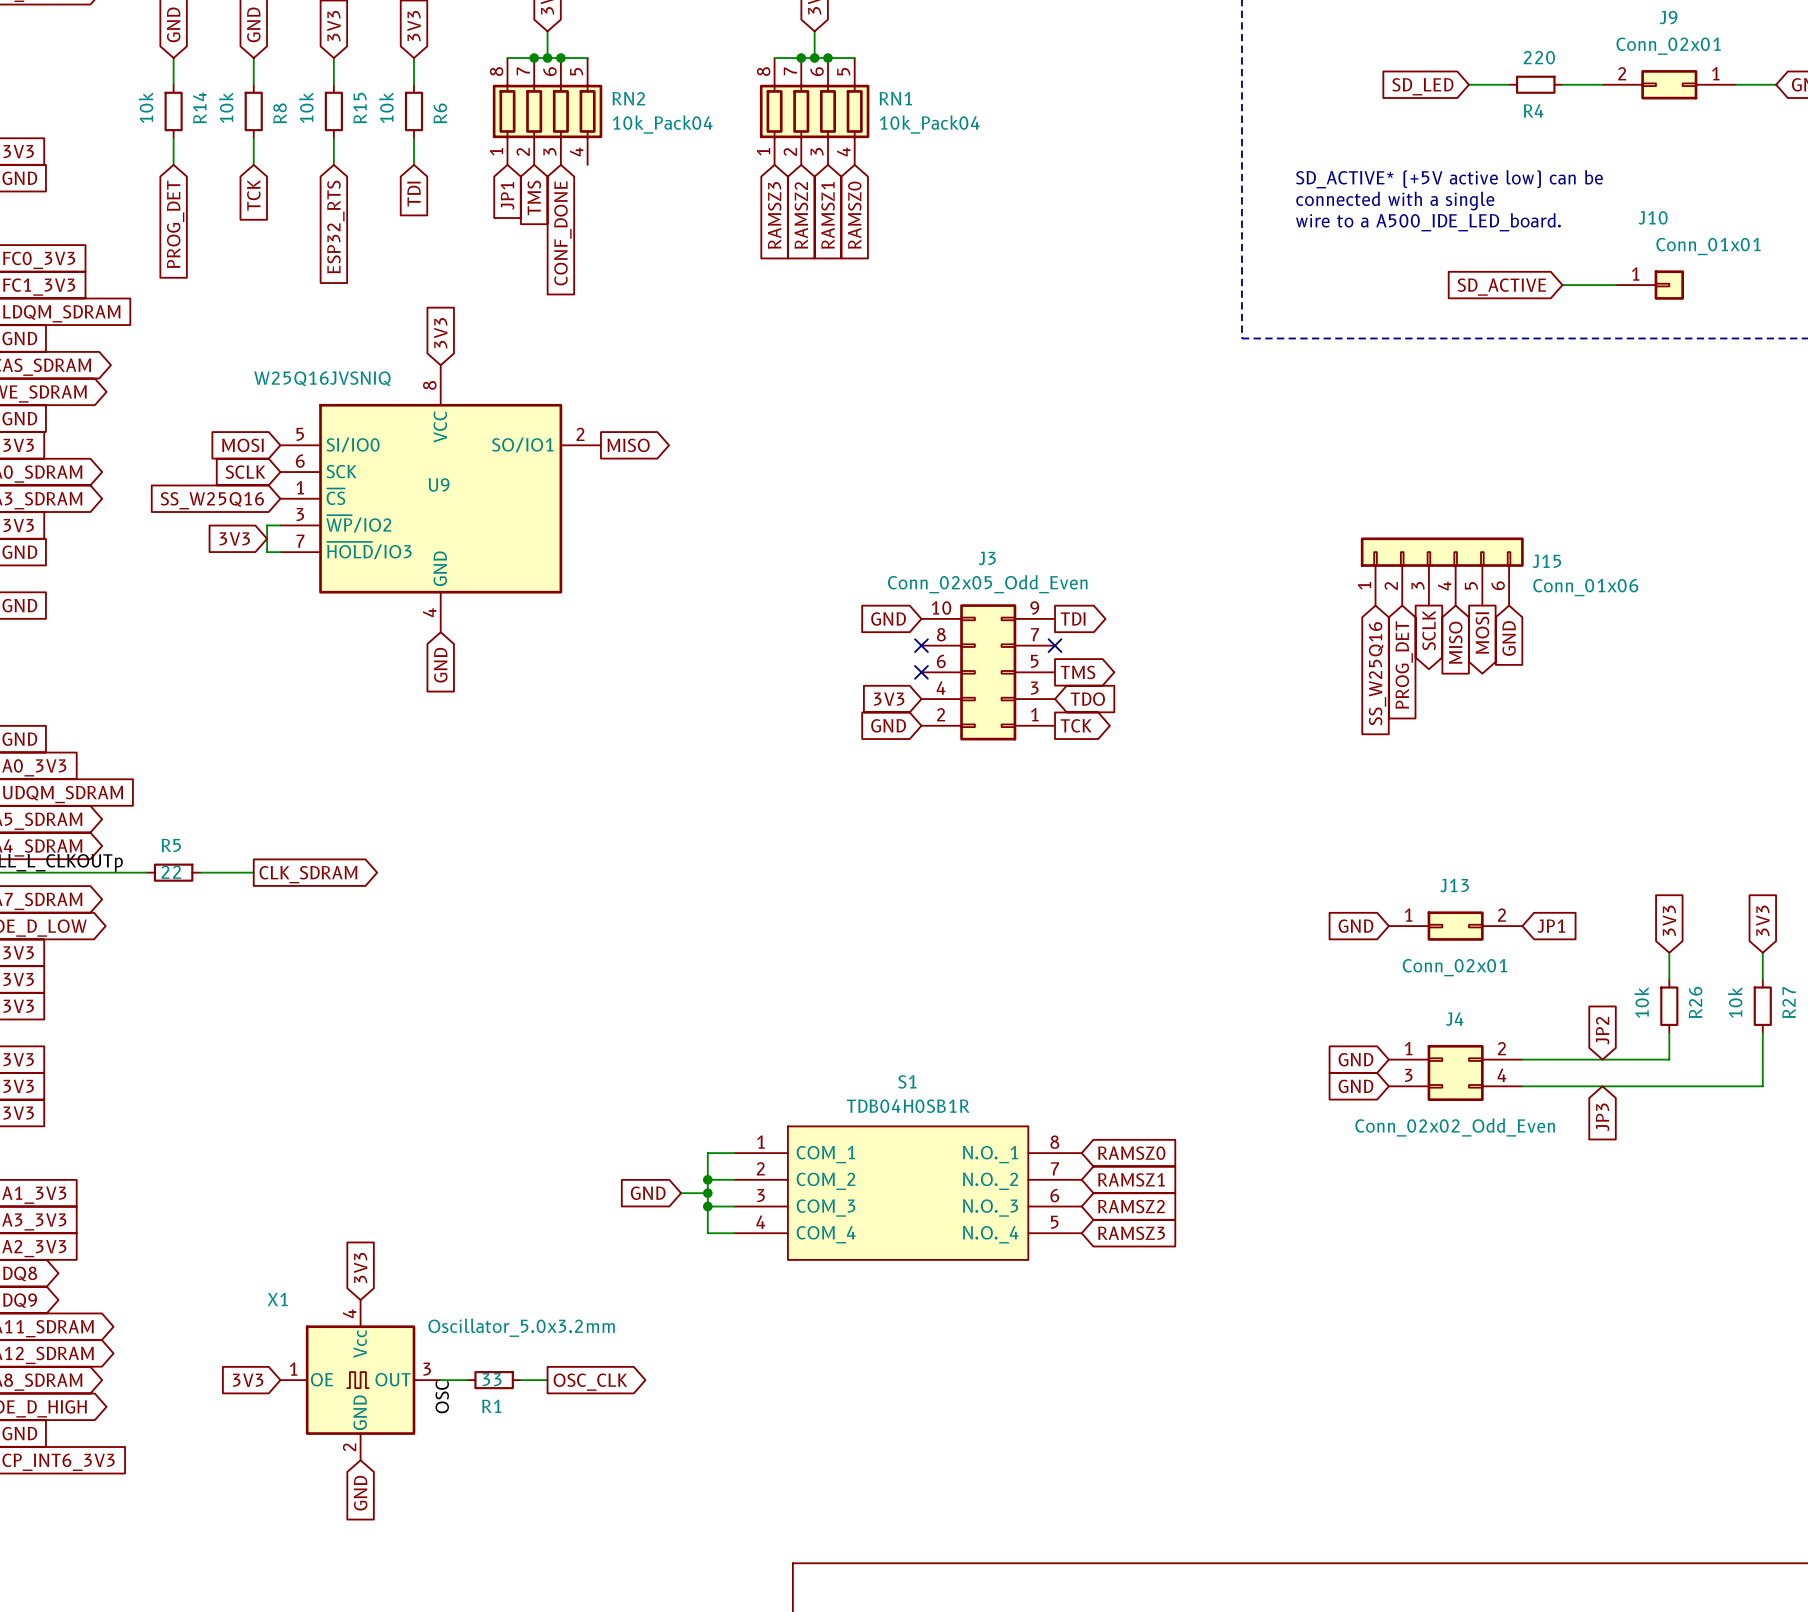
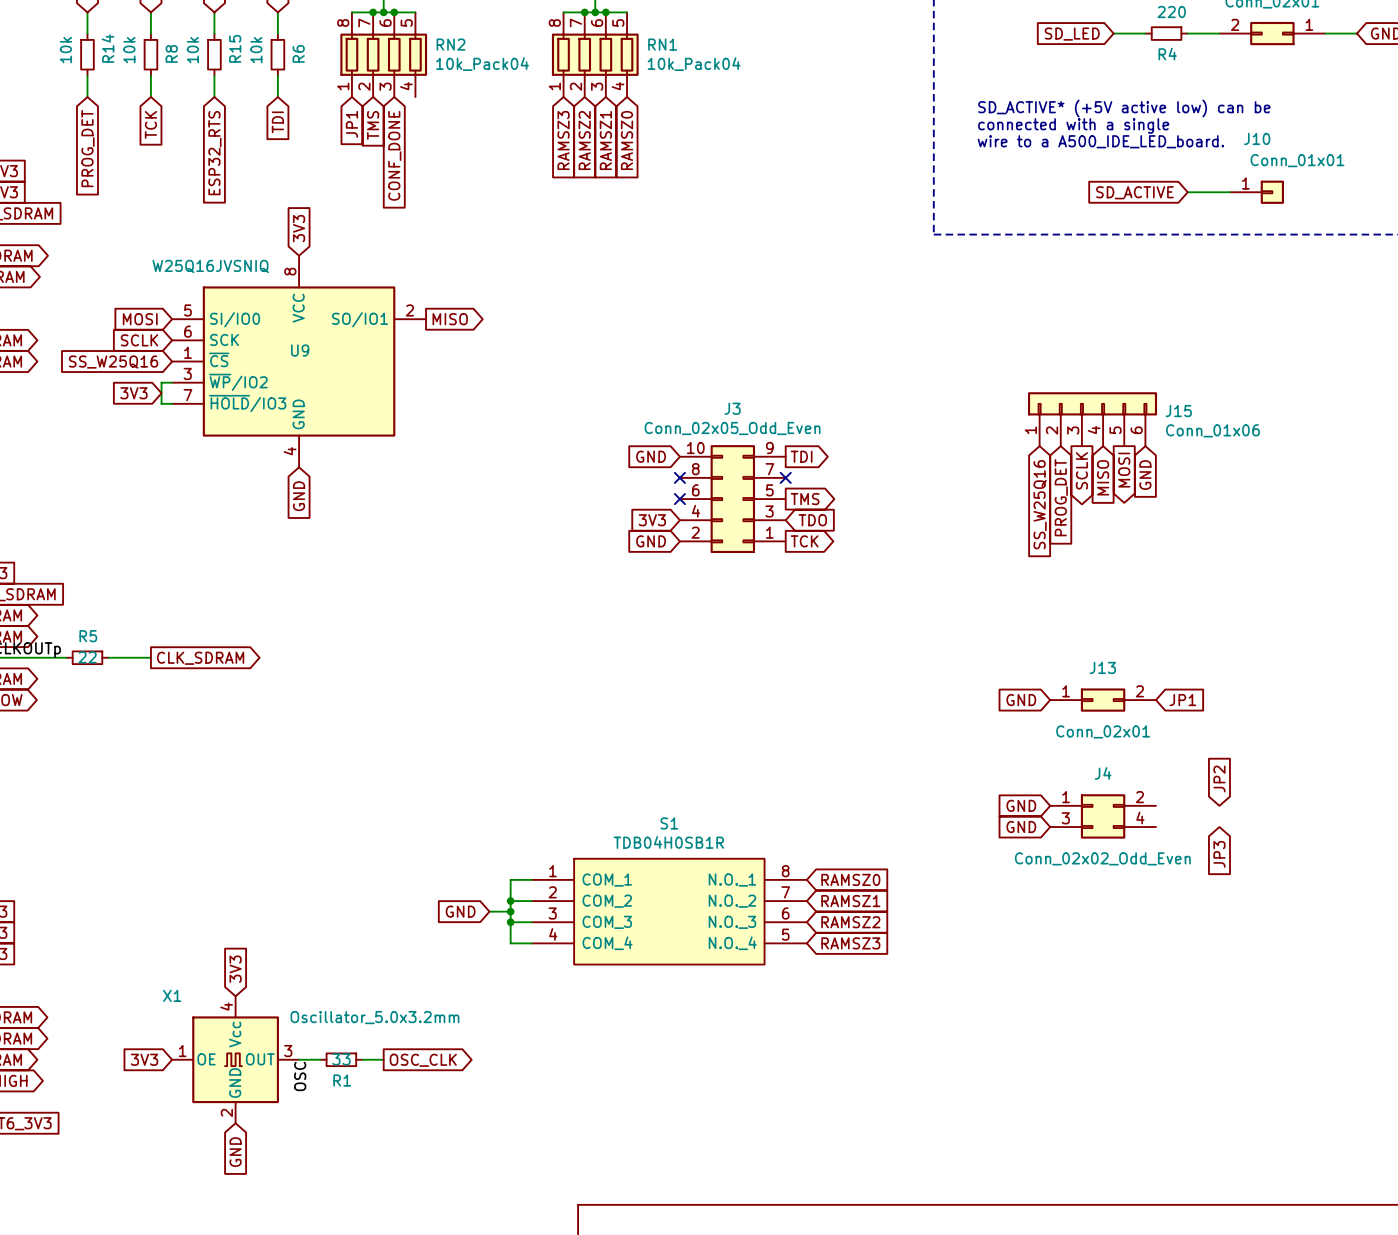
global label: 3V3 (1669, 920) -> none
global label: 3V3 (1762, 920) -> none
wire: (1669, 952) (1669, 979) -> none
wire: (1762, 952) (1762, 979) -> none
R26: 10k (1669, 1006) -> none
R27: 10k (1762, 1006) -> none
wire: (1669, 1032) (1669, 1059) (1522, 1059) -> none
wire: (1762, 1032) (1762, 1086) (1522, 1086) -> none

